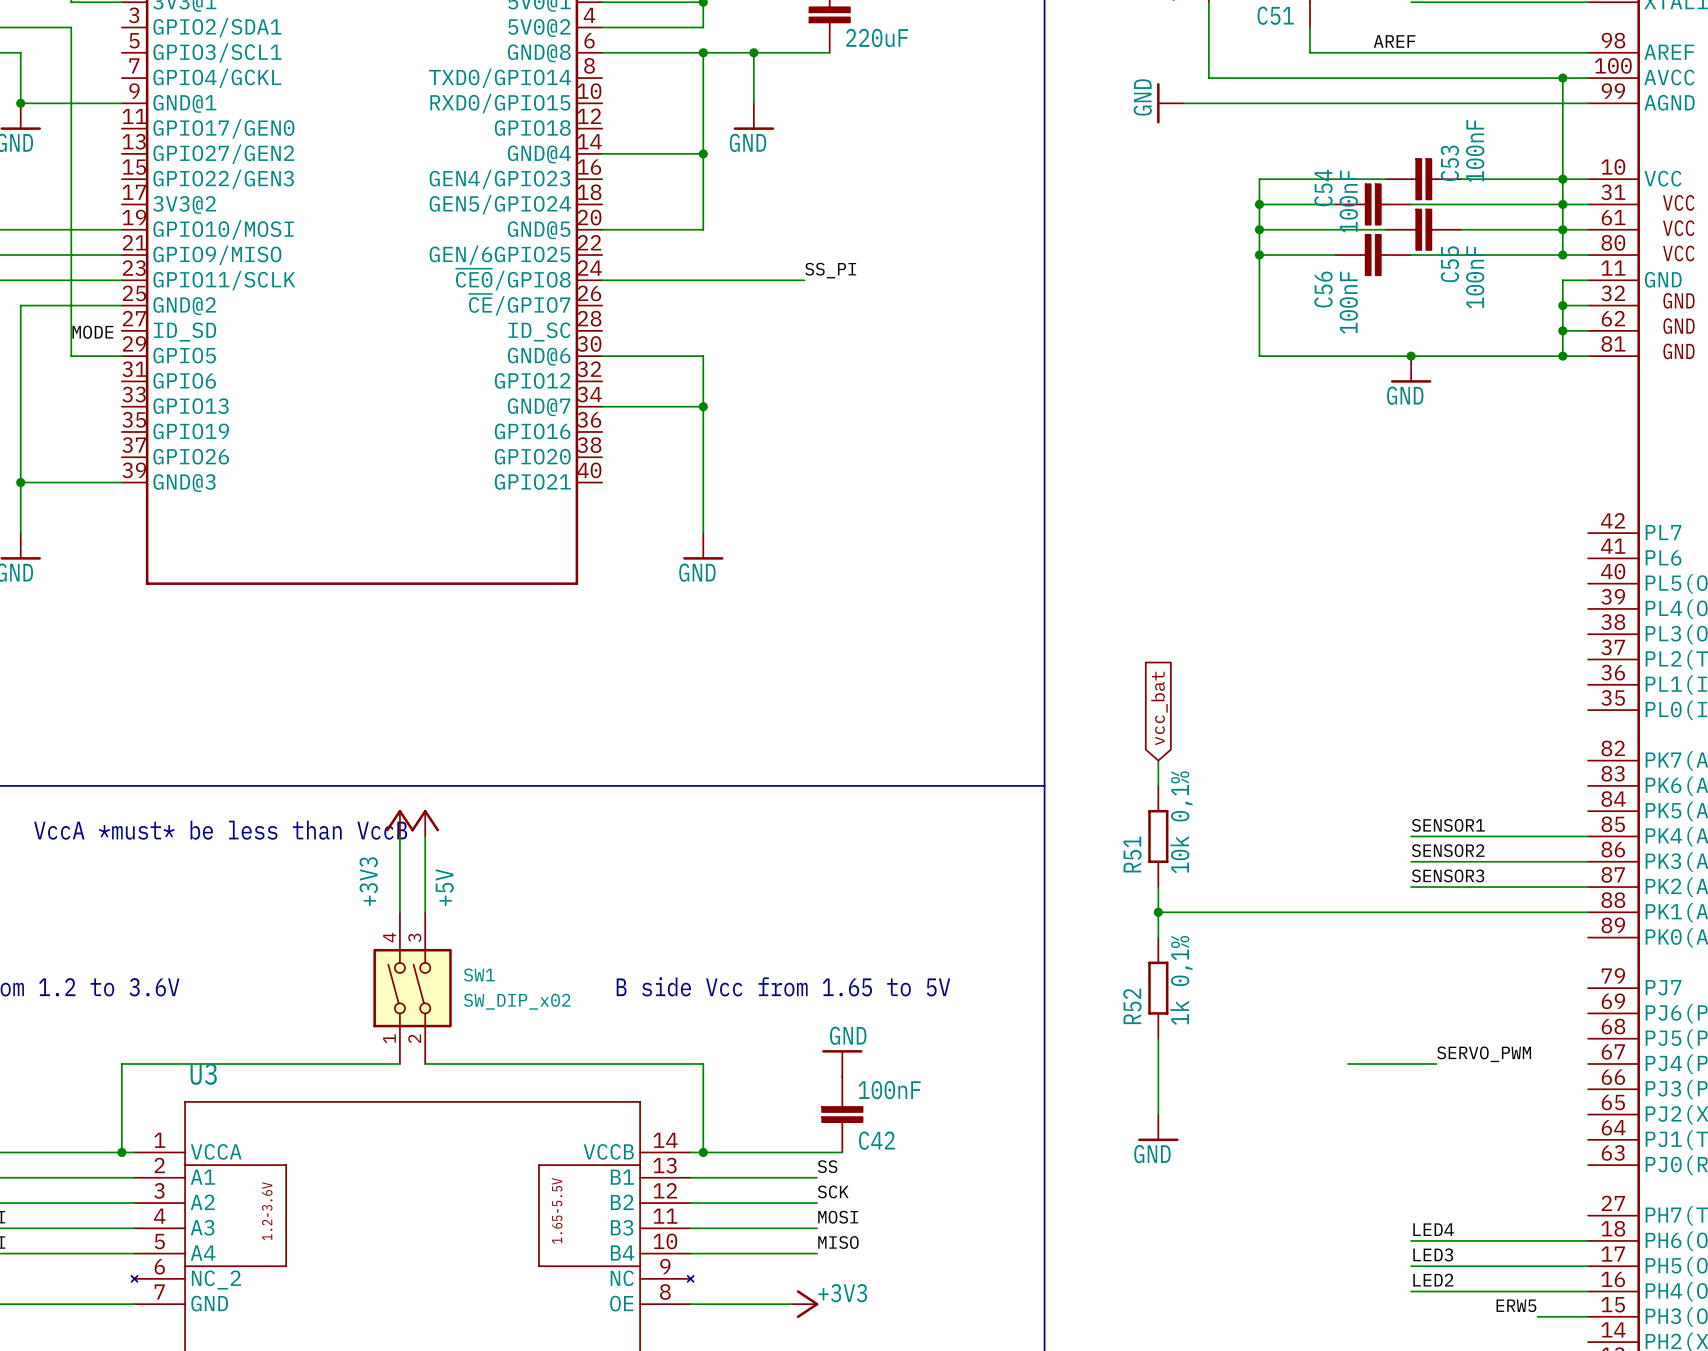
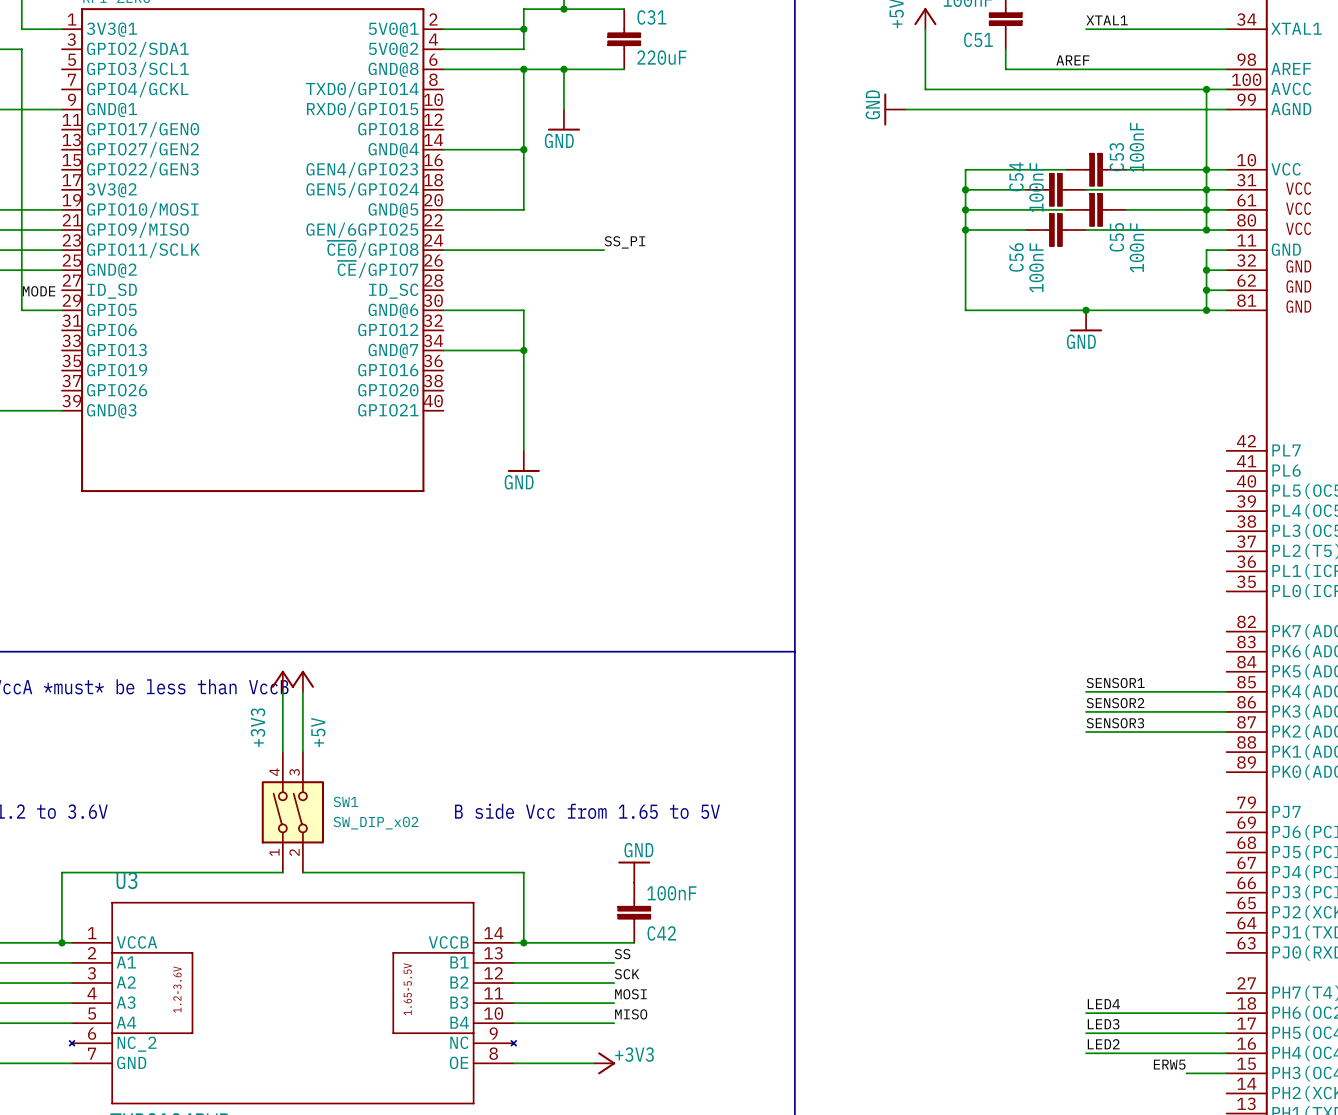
global label: vcc_bat (1159, 708) -> none
wire: (1158, 760) (1158, 785) -> none
R51: 10k 0,1% (1158, 836) -> none
wire: (1158, 887) (1158, 937) -> none
wire: (1158, 912) (1588, 912) -> none
junction: (1158, 912) -> none
R52: 1k 0,1% (1158, 988) -> none
wire: (1158, 1038) (1158, 1114) -> none
label: SERVO_PWM (1484, 1054) -> none
wire: (1347, 1063) (1436, 1063) -> none
power symbol: GND (1158, 1127) -> none

